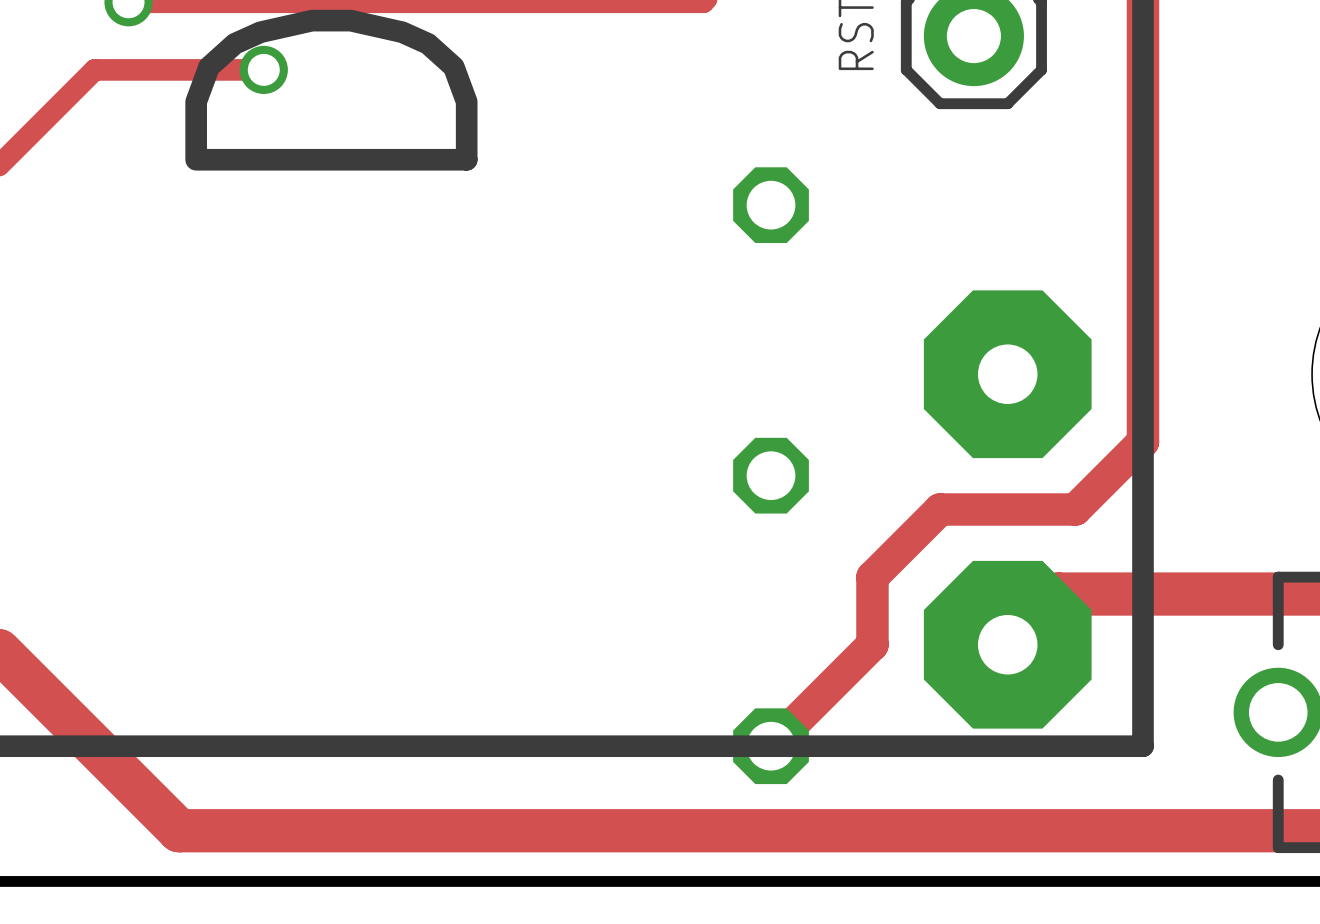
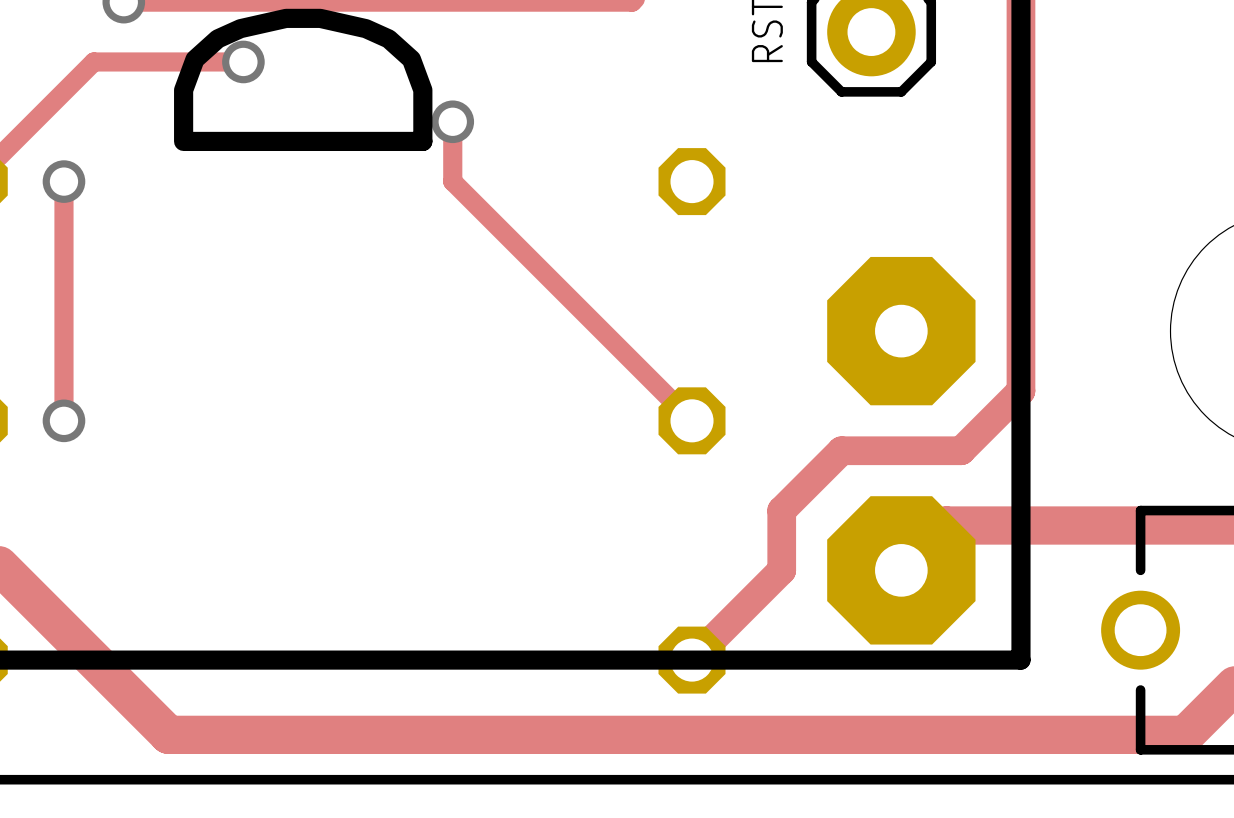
track: none -> (452, 121) (452, 181) (692, 420)
via: none -> (452, 121)
track: none -> (63, 181) (63, 420)
via: none -> (63, 181)
via: none -> (63, 420)

